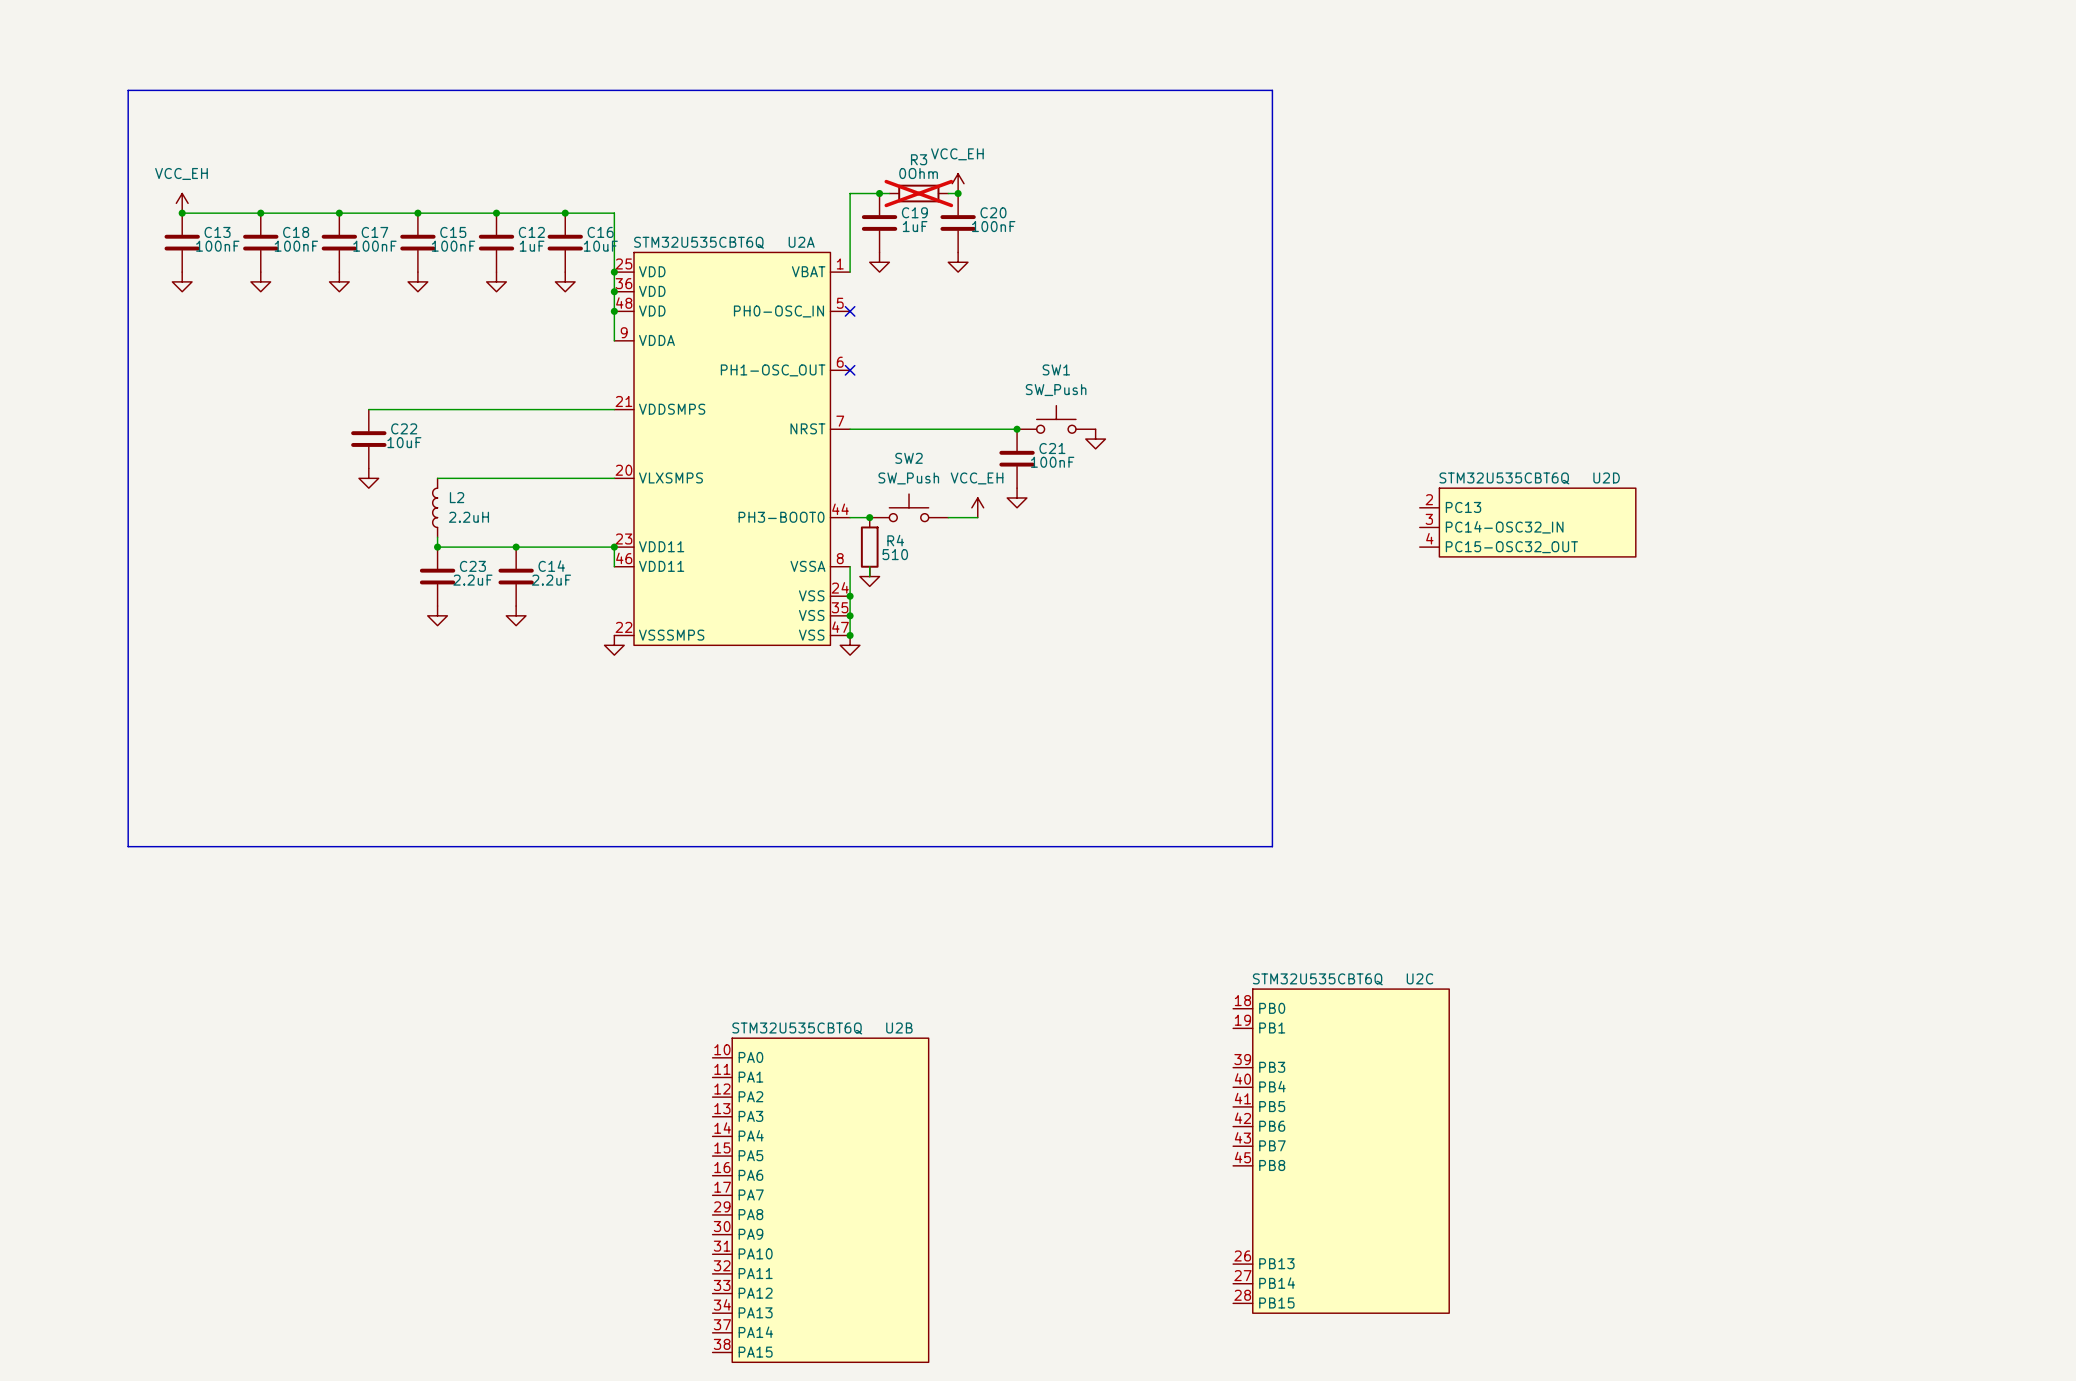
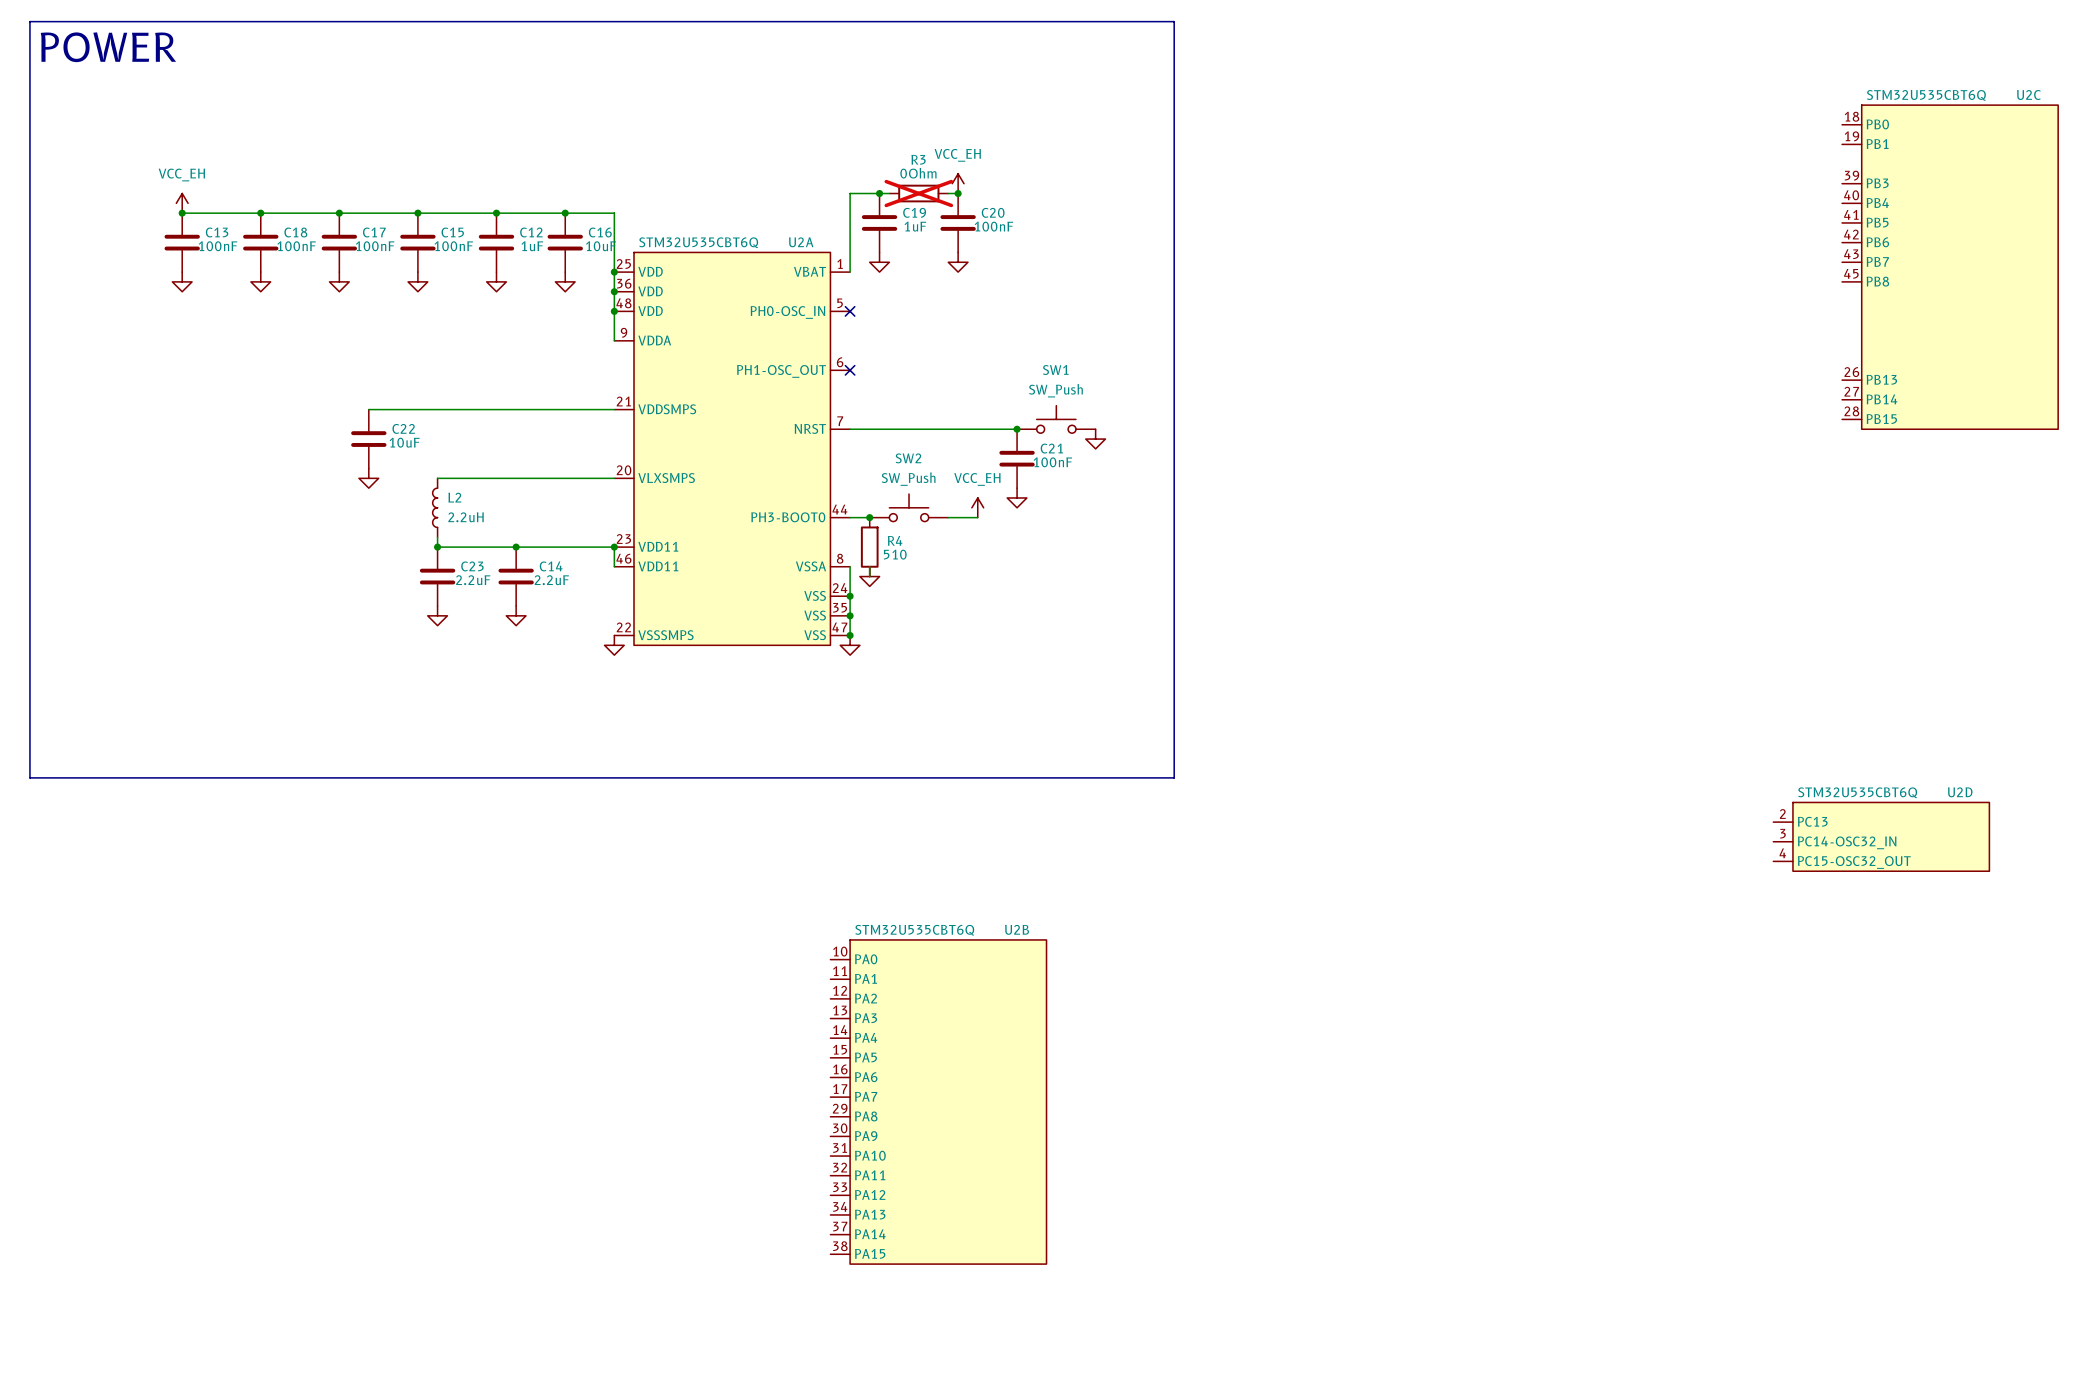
text: none -> POWER (108, 47)
line: (128, 90) (1272, 90) (1272, 846) (128, 846) (128, 90) -> (29, 21) (1174, 21) (1174, 777) (29, 777) (29, 21)
U2D position: (1527, 522) -> (1881, 836)
U2C position: (1341, 1151) -> (1950, 267)
U2B position: (820, 1200) -> (938, 1102)

